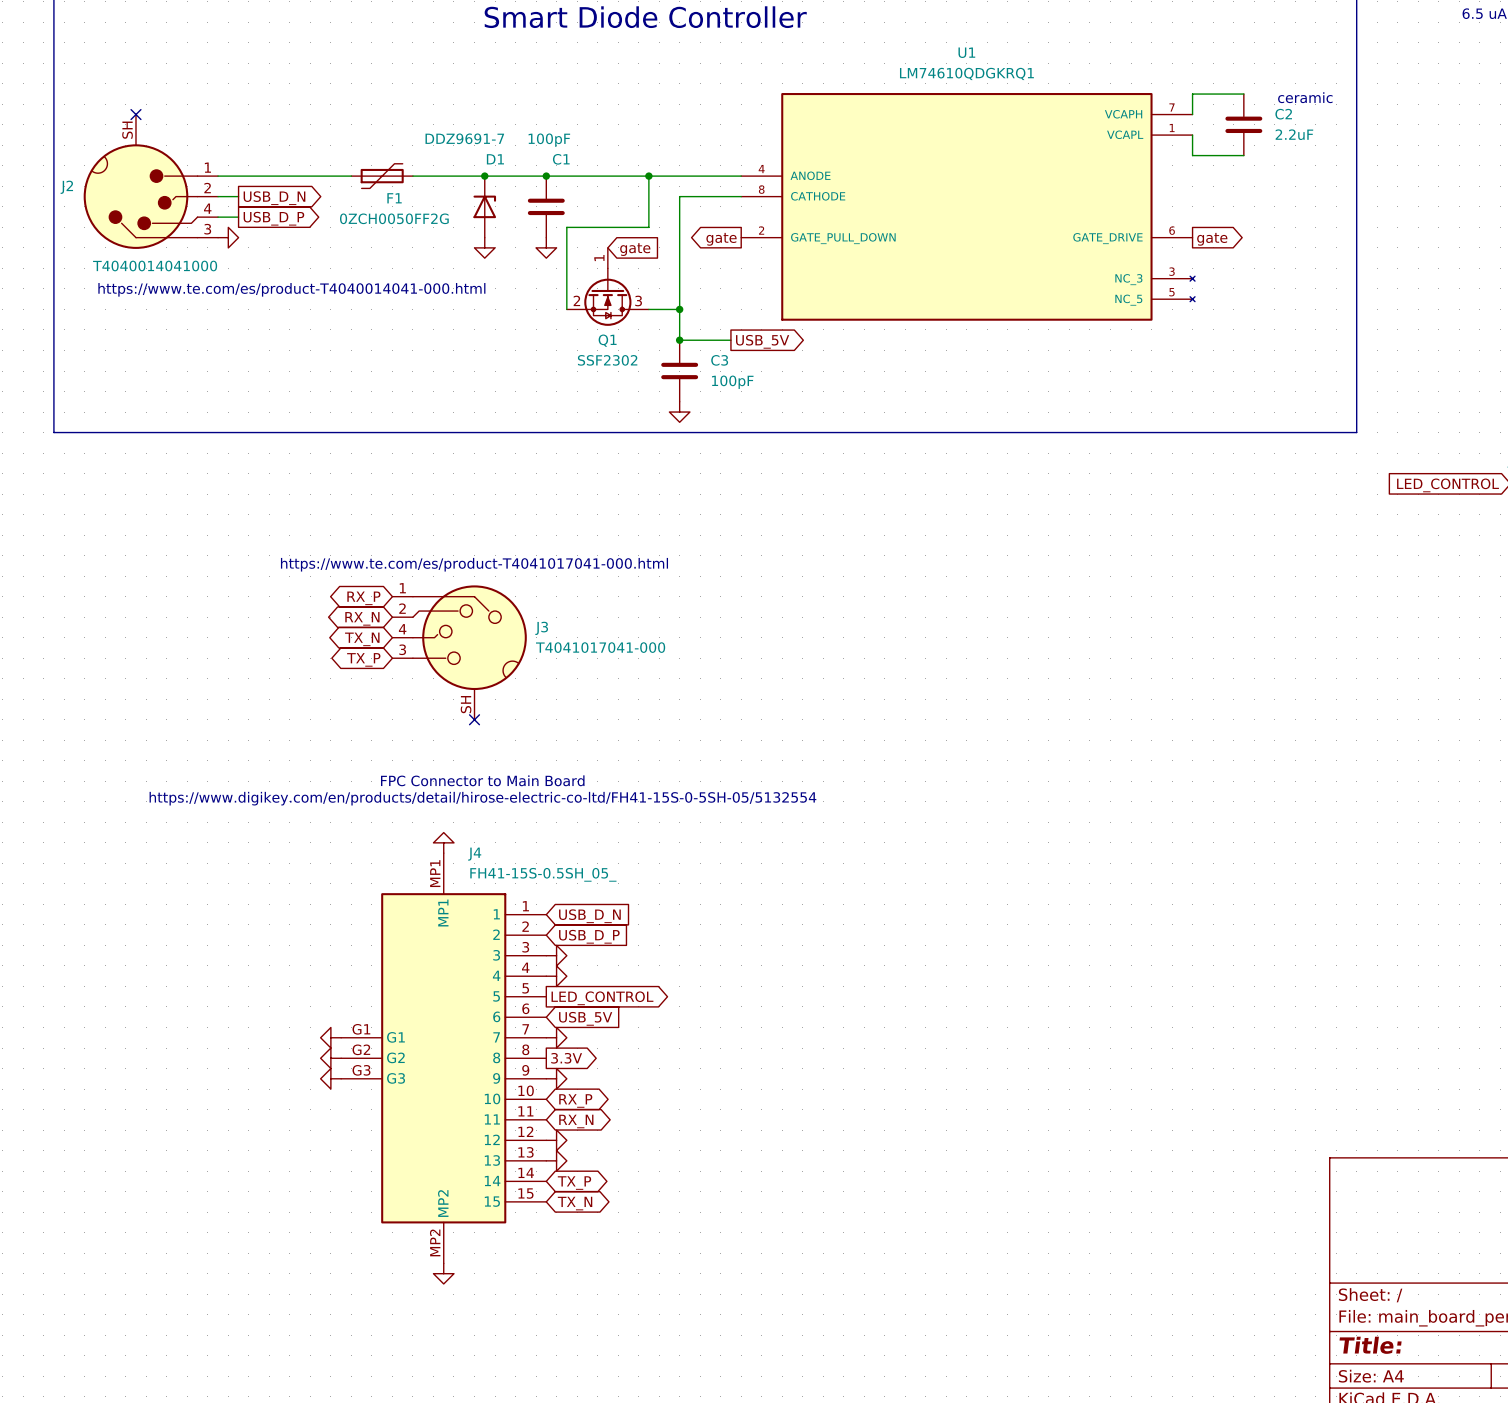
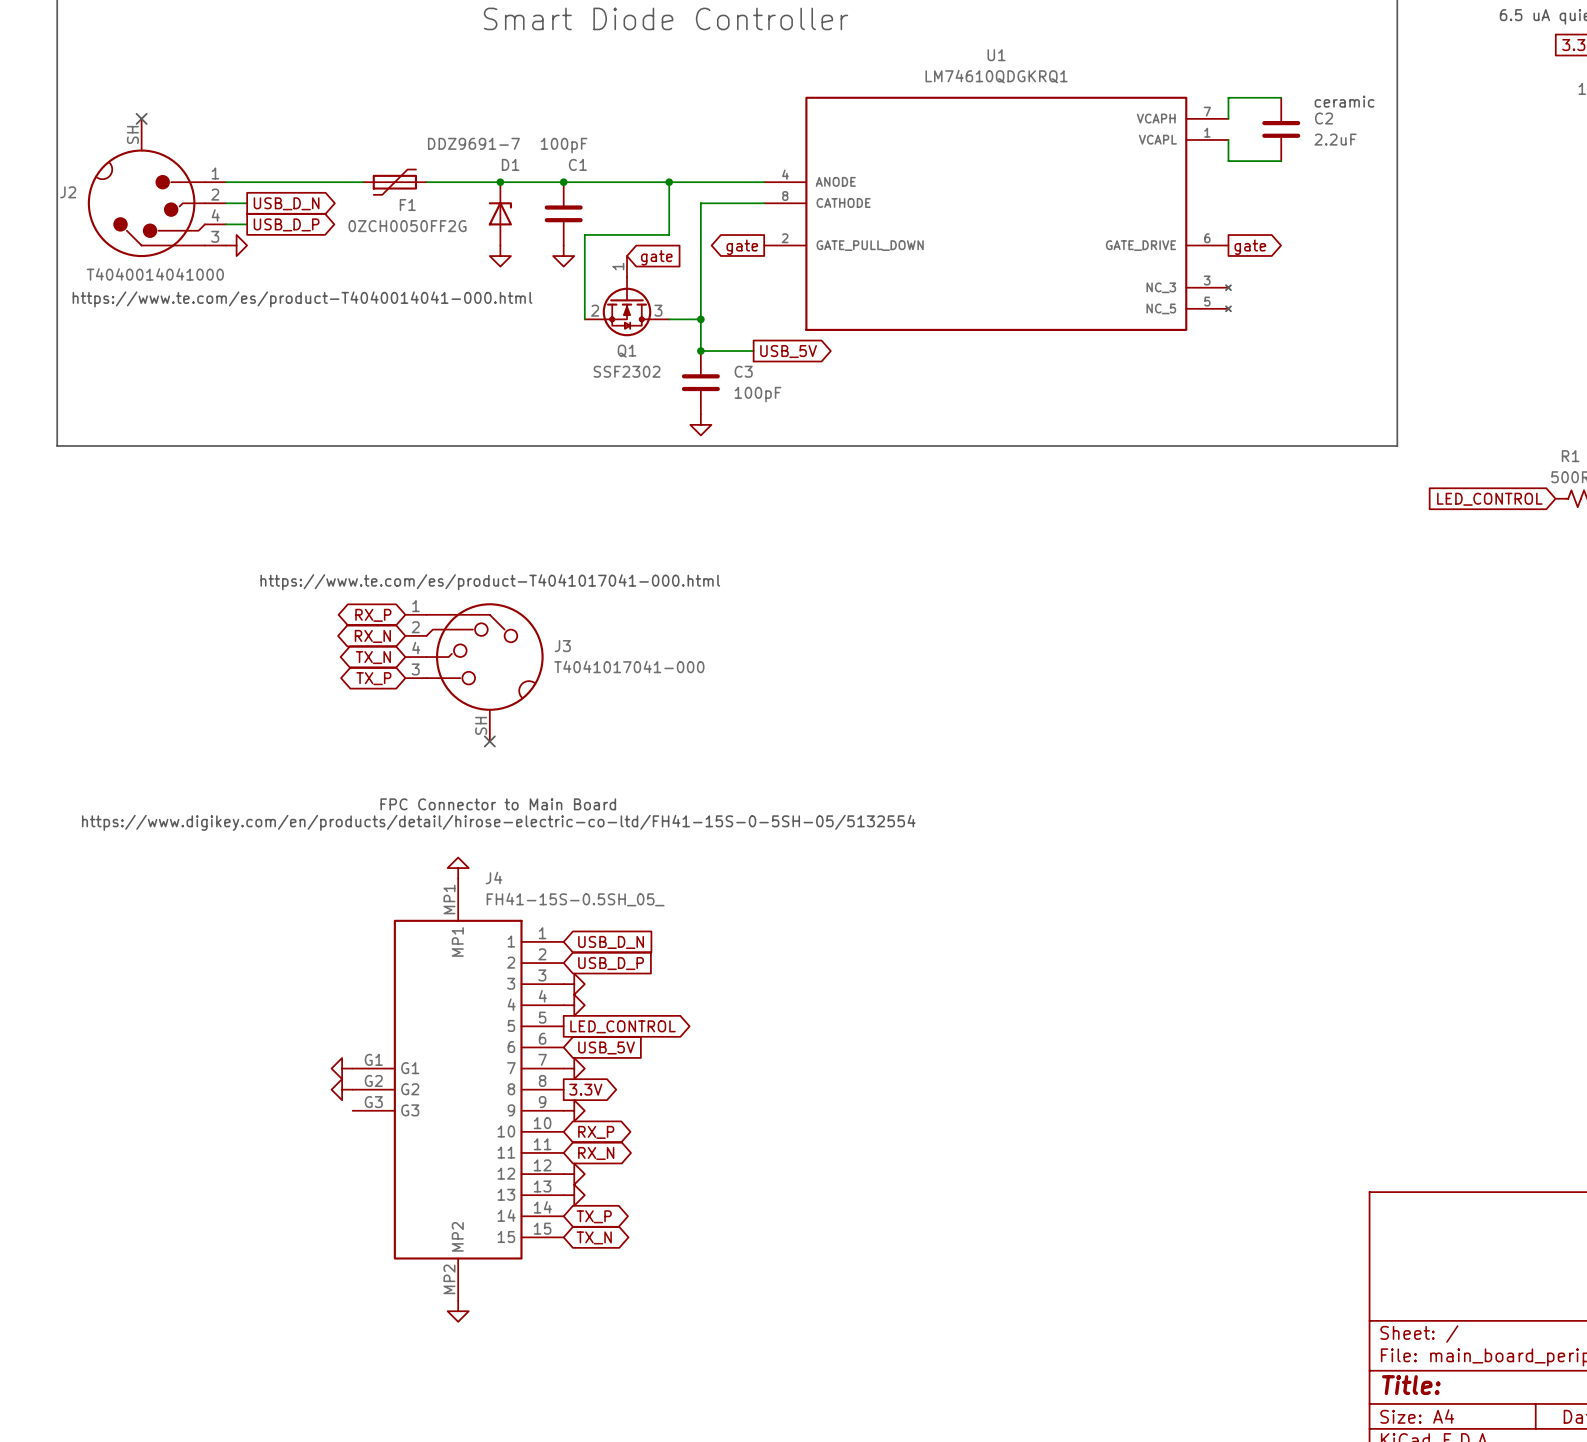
power symbol: (330, 1078) -> none

